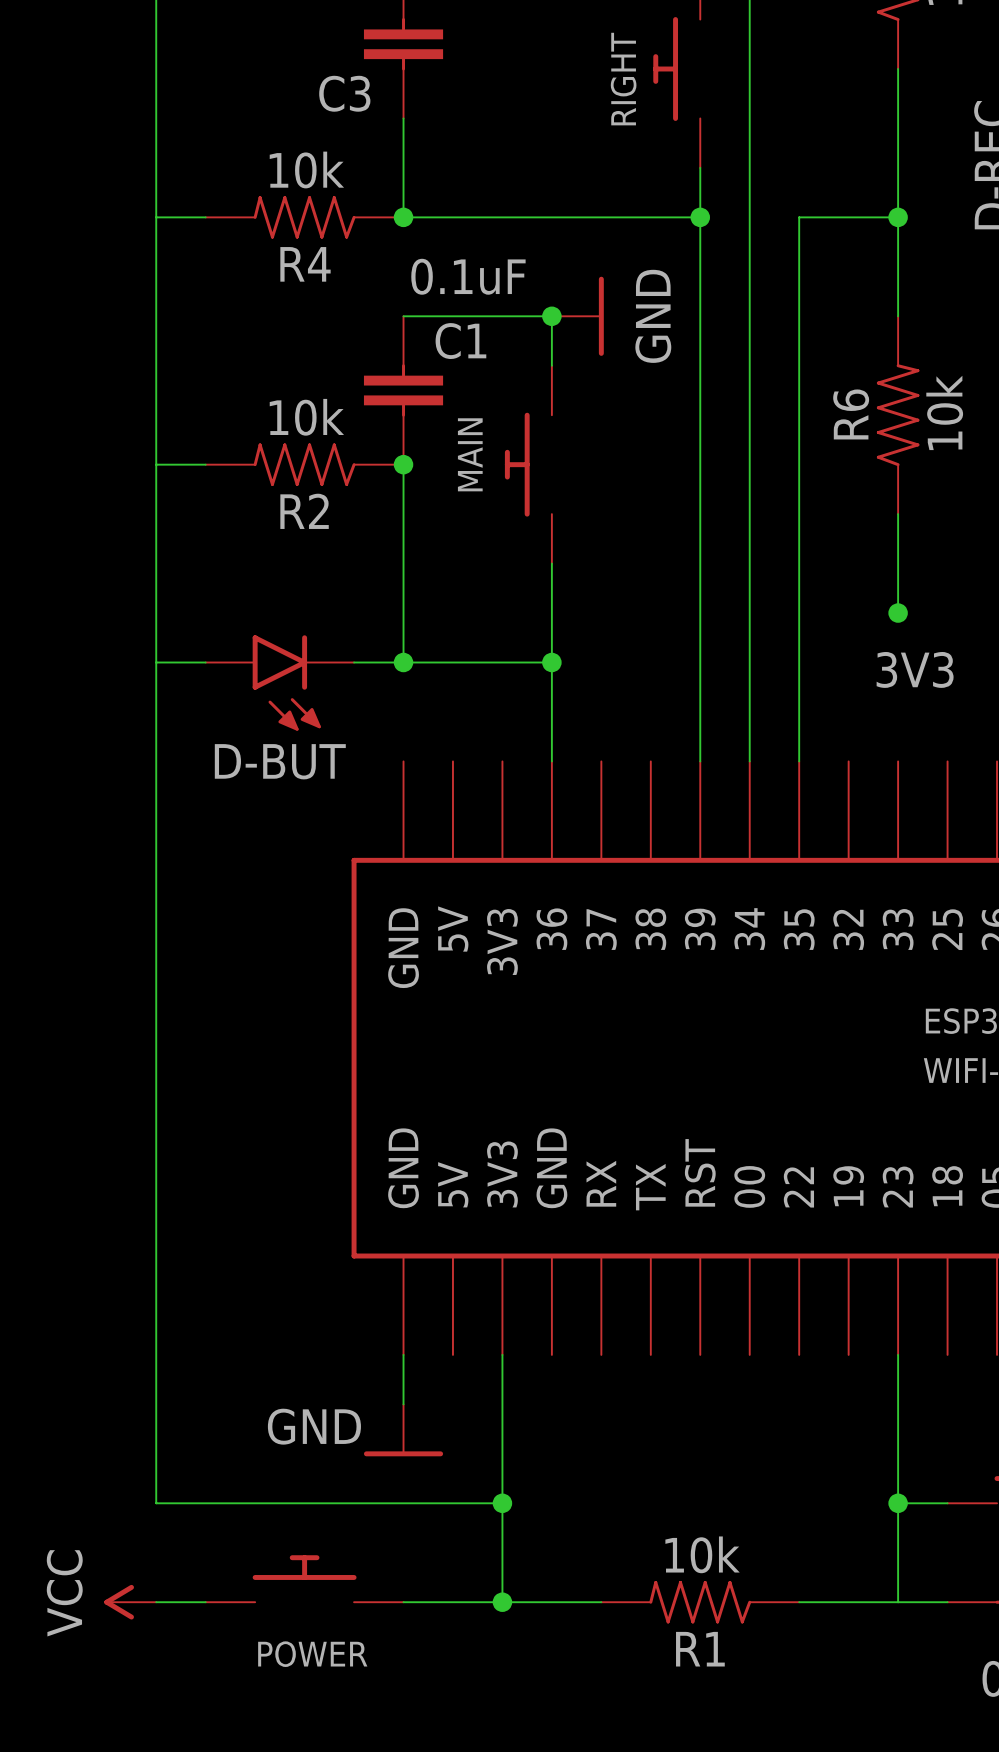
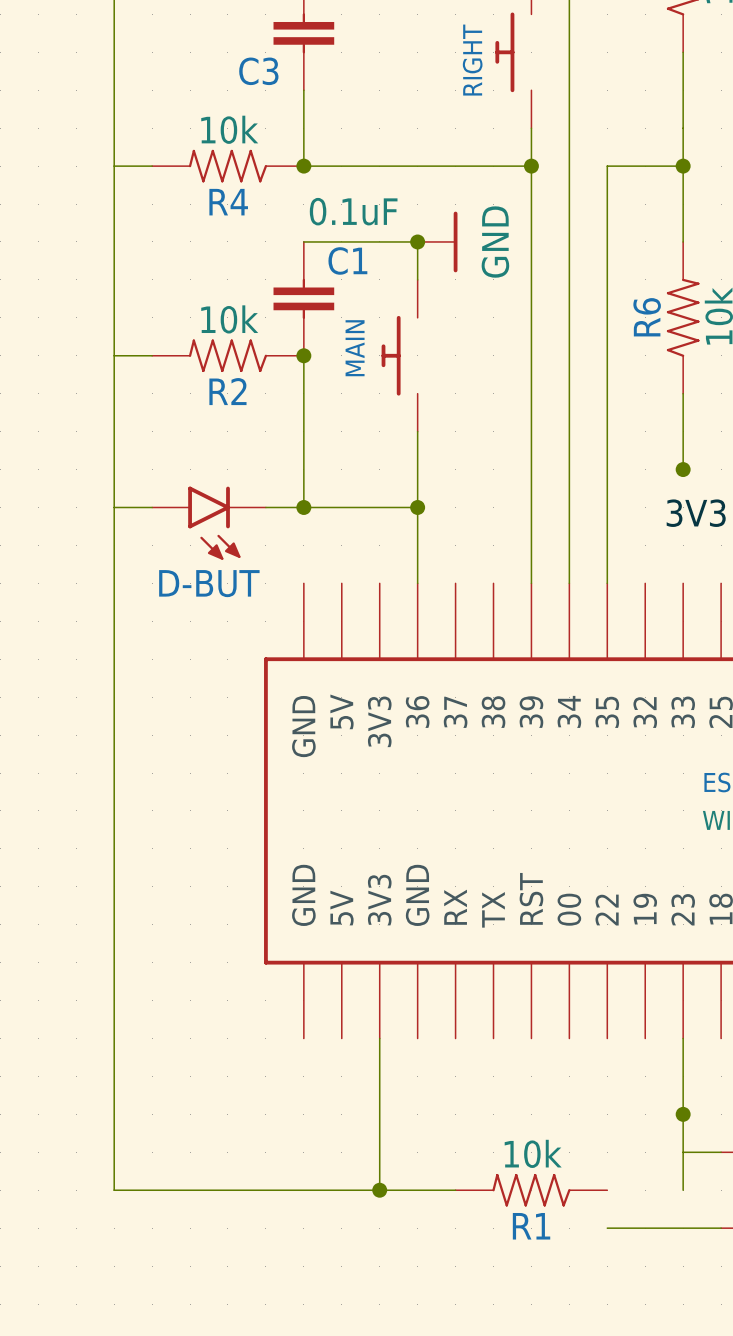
wire: (403, 1354) (403, 1404) -> none
power symbol: GND (403, 1430) -> none
wire: (156, 1503) (502, 1503) -> (114, 1152) (114, 1190) (455, 1190)
junction: (502, 1503) -> none
junction position: (898, 1503) -> (683, 1114)
wire: (502, 1552) (502, 1602) -> none
junction: none -> (379, 1190)
wire: (898, 1552) (898, 1602) -> none
POWER: (304, 1578) -> none
power symbol: VCC (130, 1602) -> none
wire: (156, 1602) (205, 1602) -> none
wire: (403, 1602) (601, 1602) -> none
junction: (502, 1602) -> none
R1 position: (700, 1602) -> (531, 1190)

